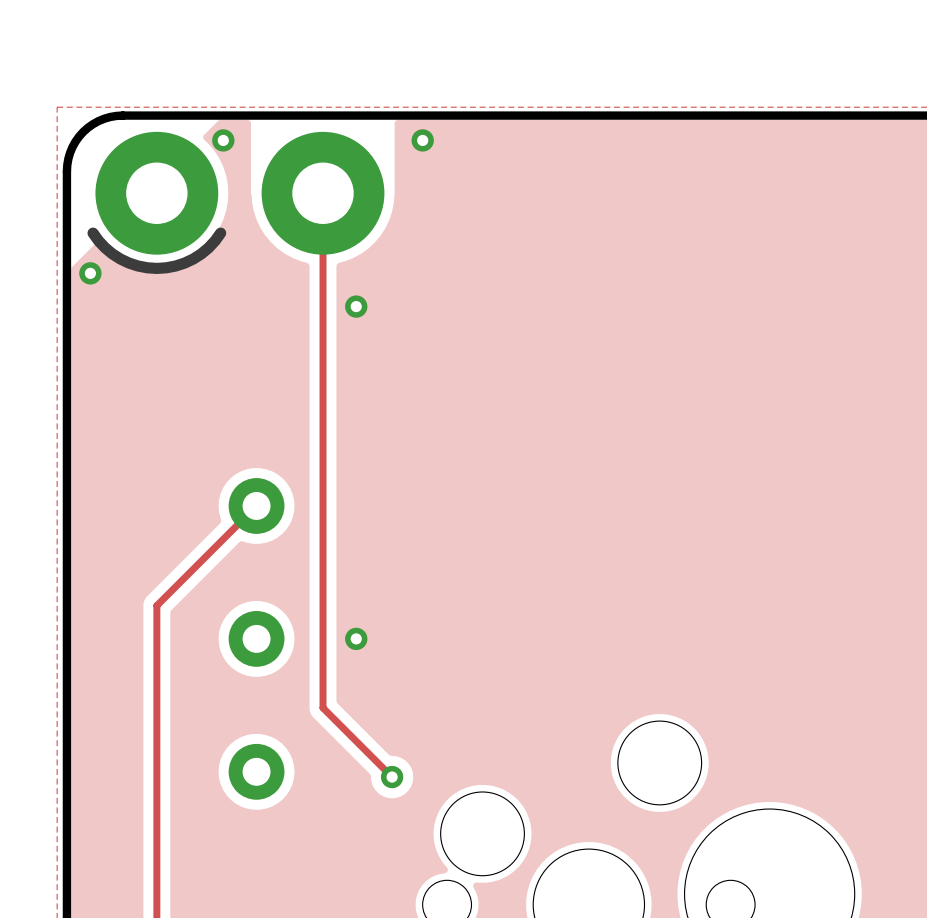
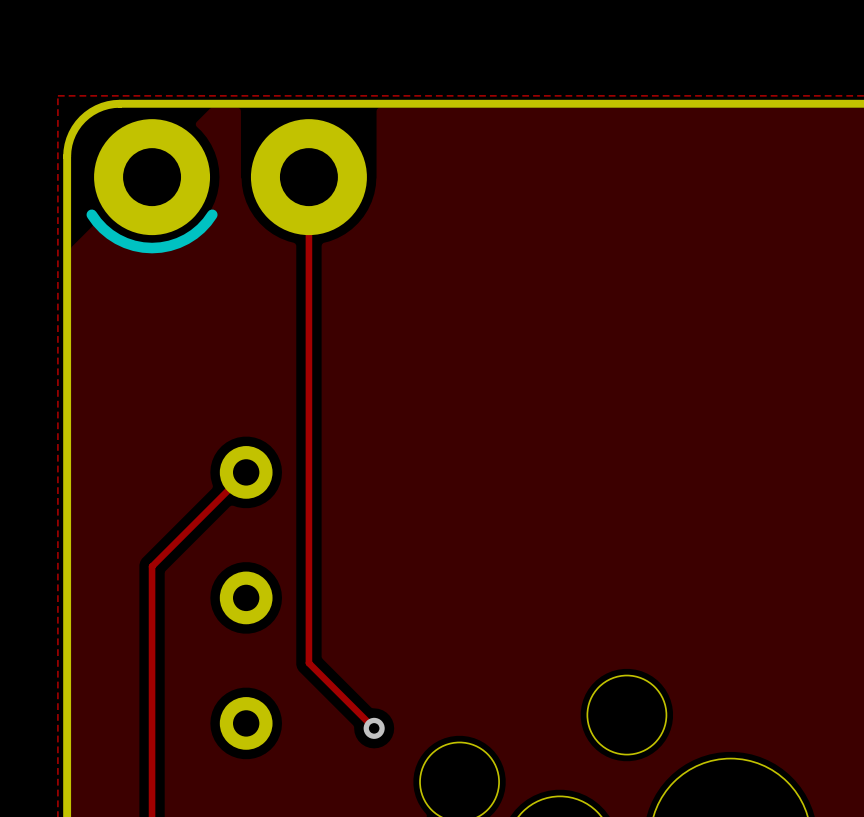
via: (223, 140) -> none
via: (422, 140) -> none
via: (90, 273) -> none
via: (356, 306) -> none
via: (356, 638) -> none

